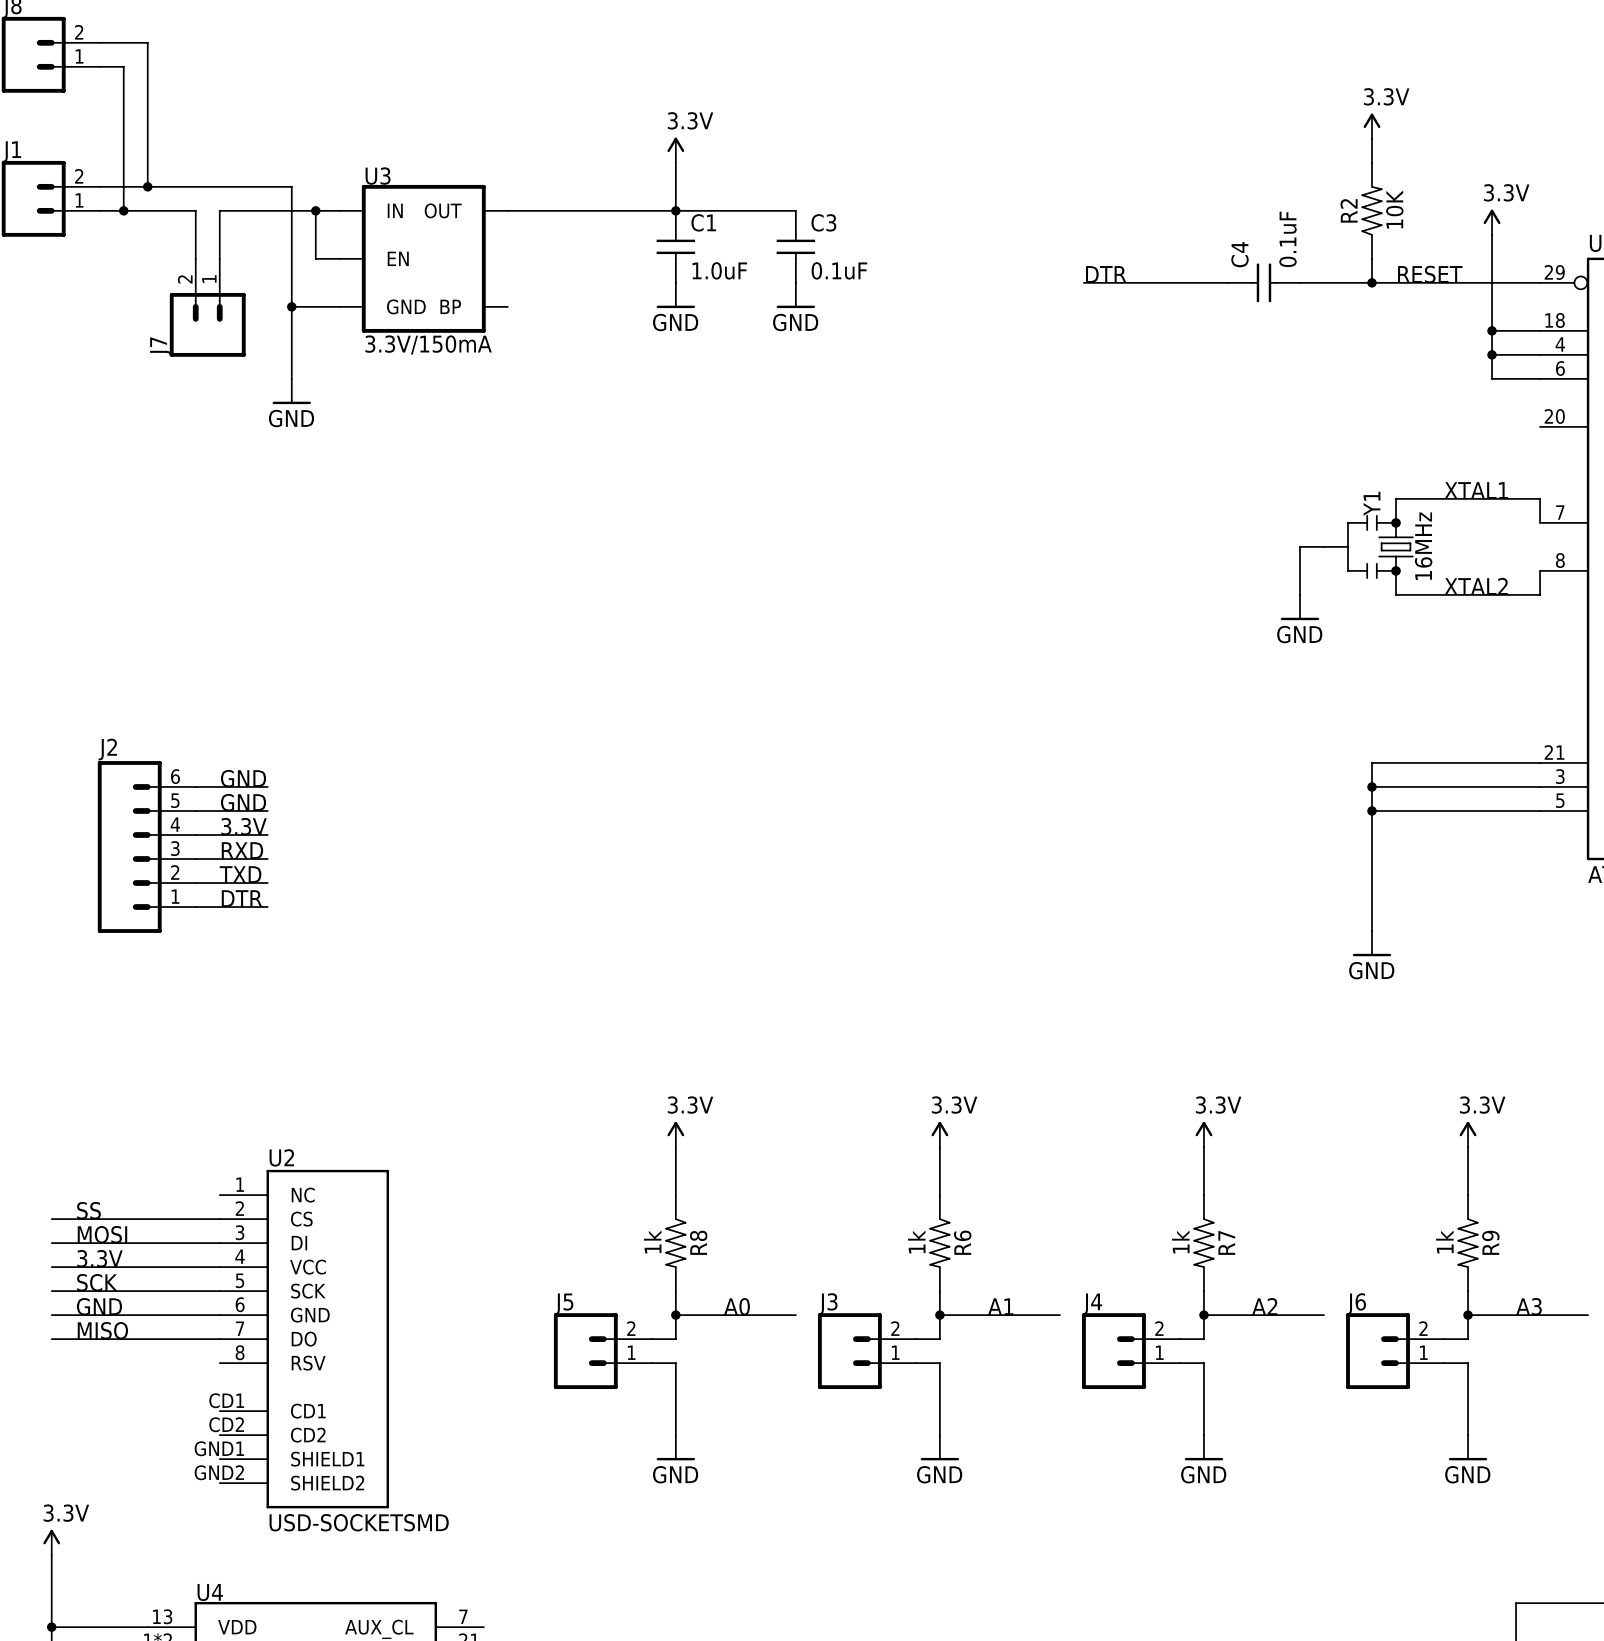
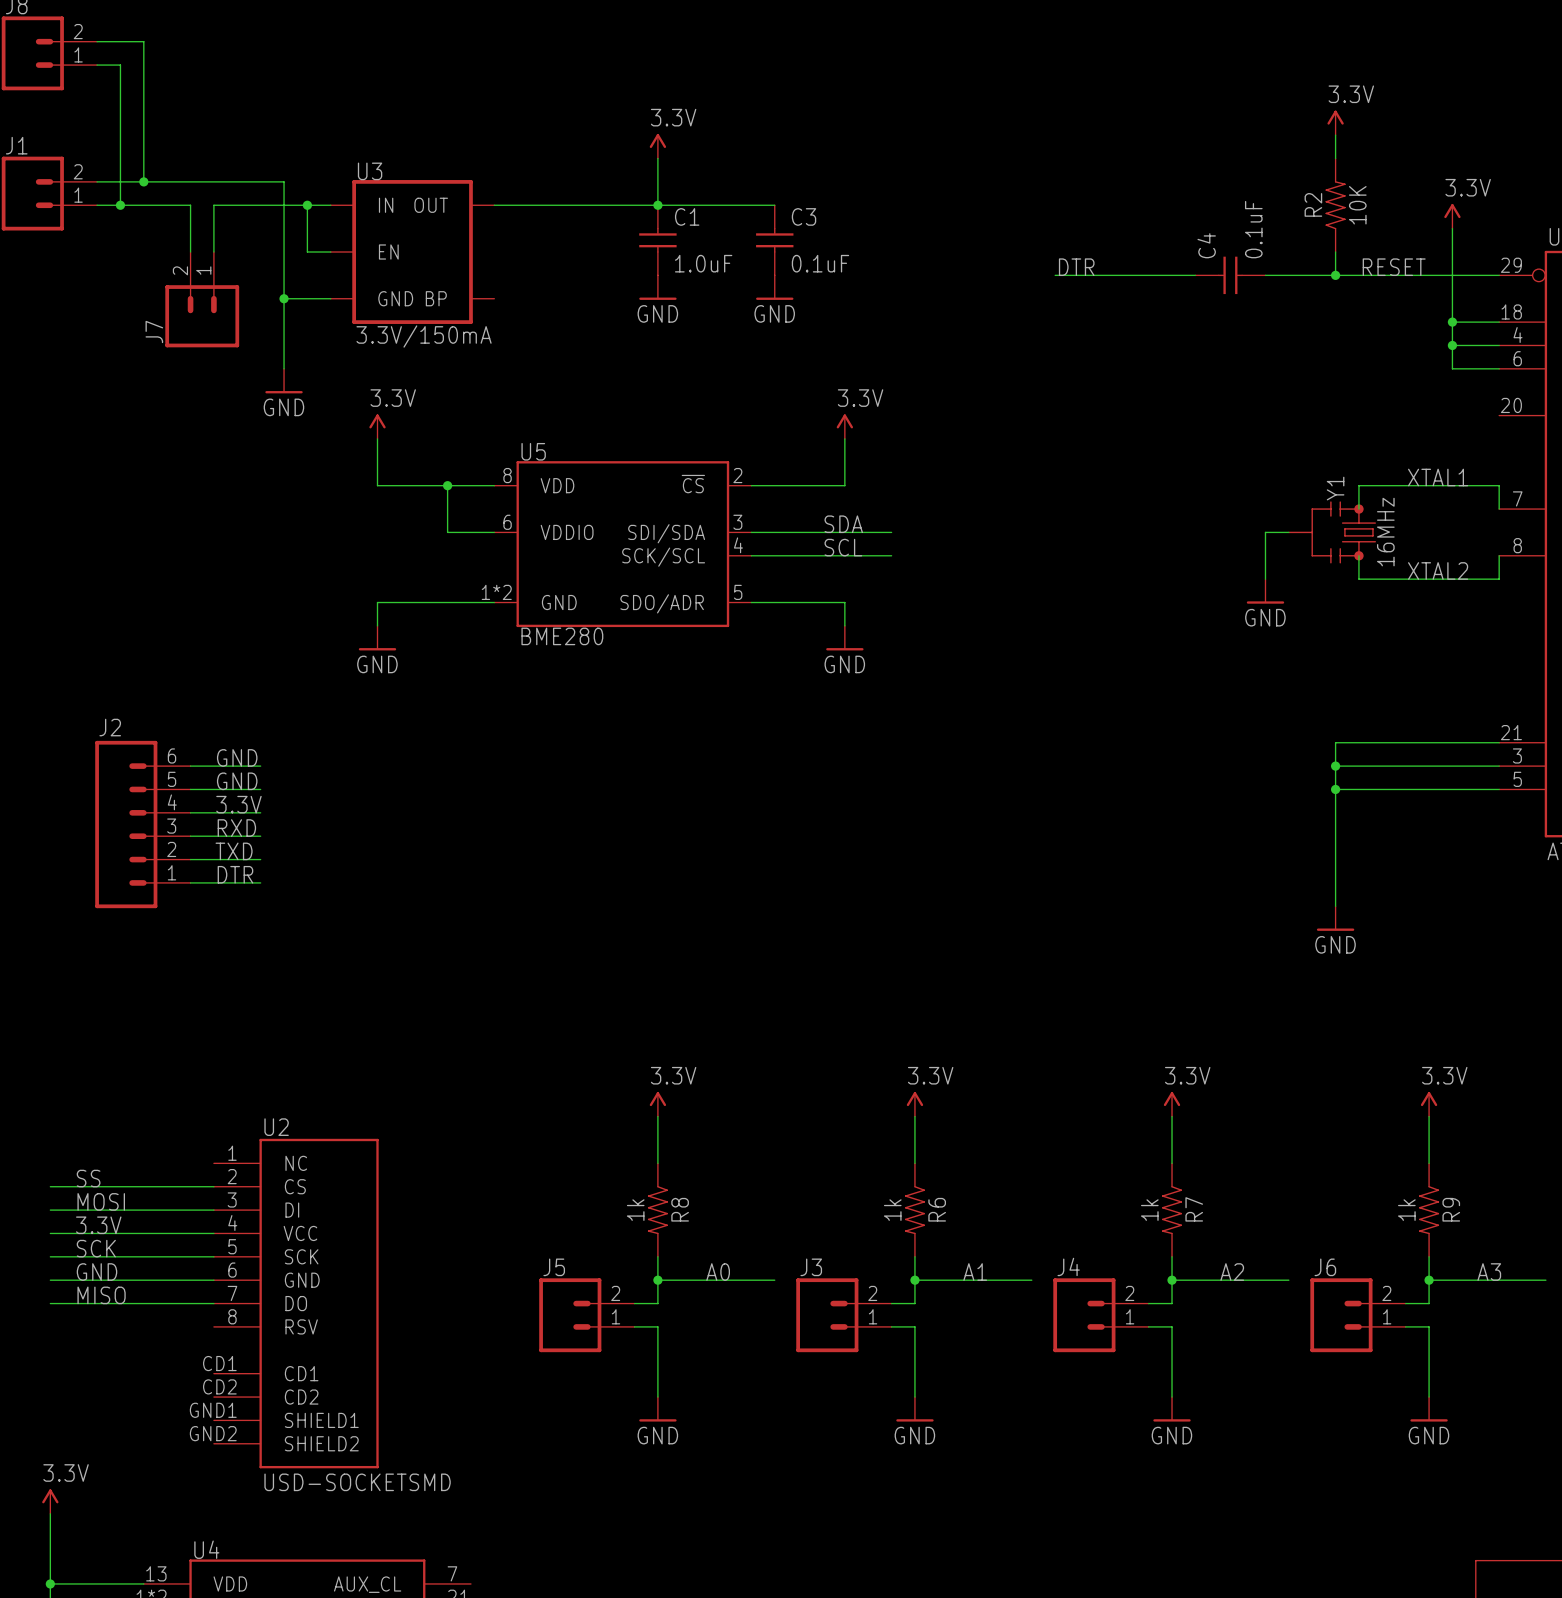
power symbol: none -> 3.3V (377, 426)
power symbol: none -> 3.3V (844, 426)
wire: none -> (377, 438) (377, 485) (494, 485)
wire: none -> (844, 438) (844, 485) (751, 485)
wire: none -> (447, 485) (447, 532) (494, 532)
junction: none -> (447, 485)
label: none -> SDA (843, 524)
wire: none -> (751, 532) (891, 532)
U5: none -> BME280 (622, 544)
label: none -> SCL (843, 547)
wire: none -> (751, 555) (891, 555)
wire: none -> (494, 602) (377, 602) (377, 625)
wire: none -> (751, 602) (844, 602) (844, 625)
power symbol: none -> GND (377, 638)
power symbol: none -> GND (844, 638)

